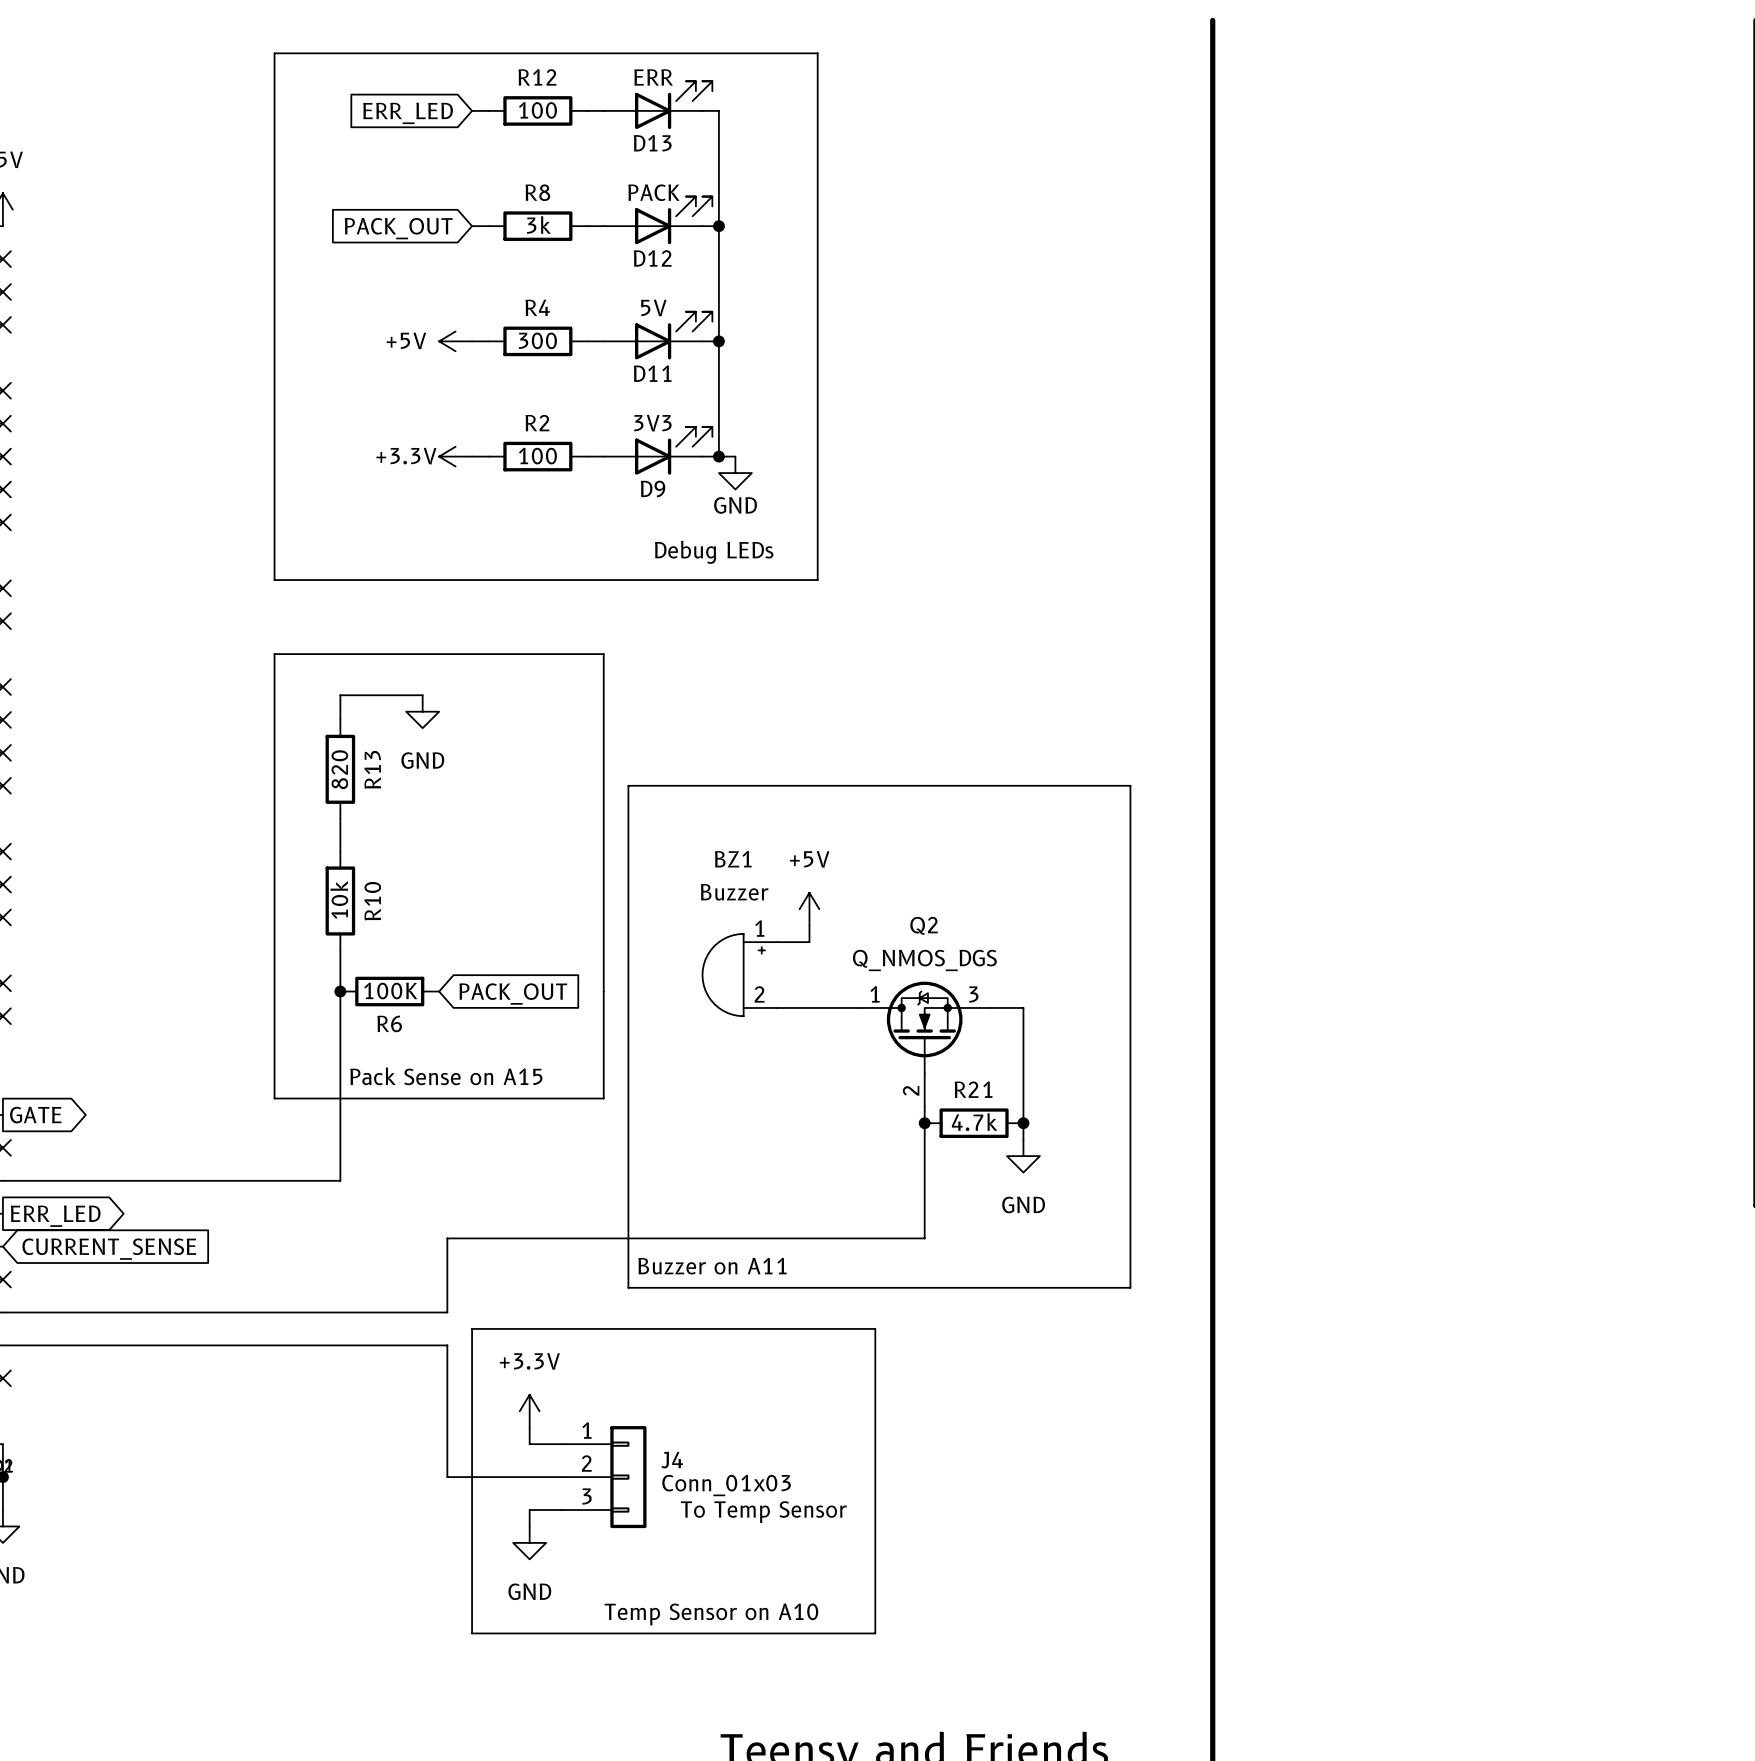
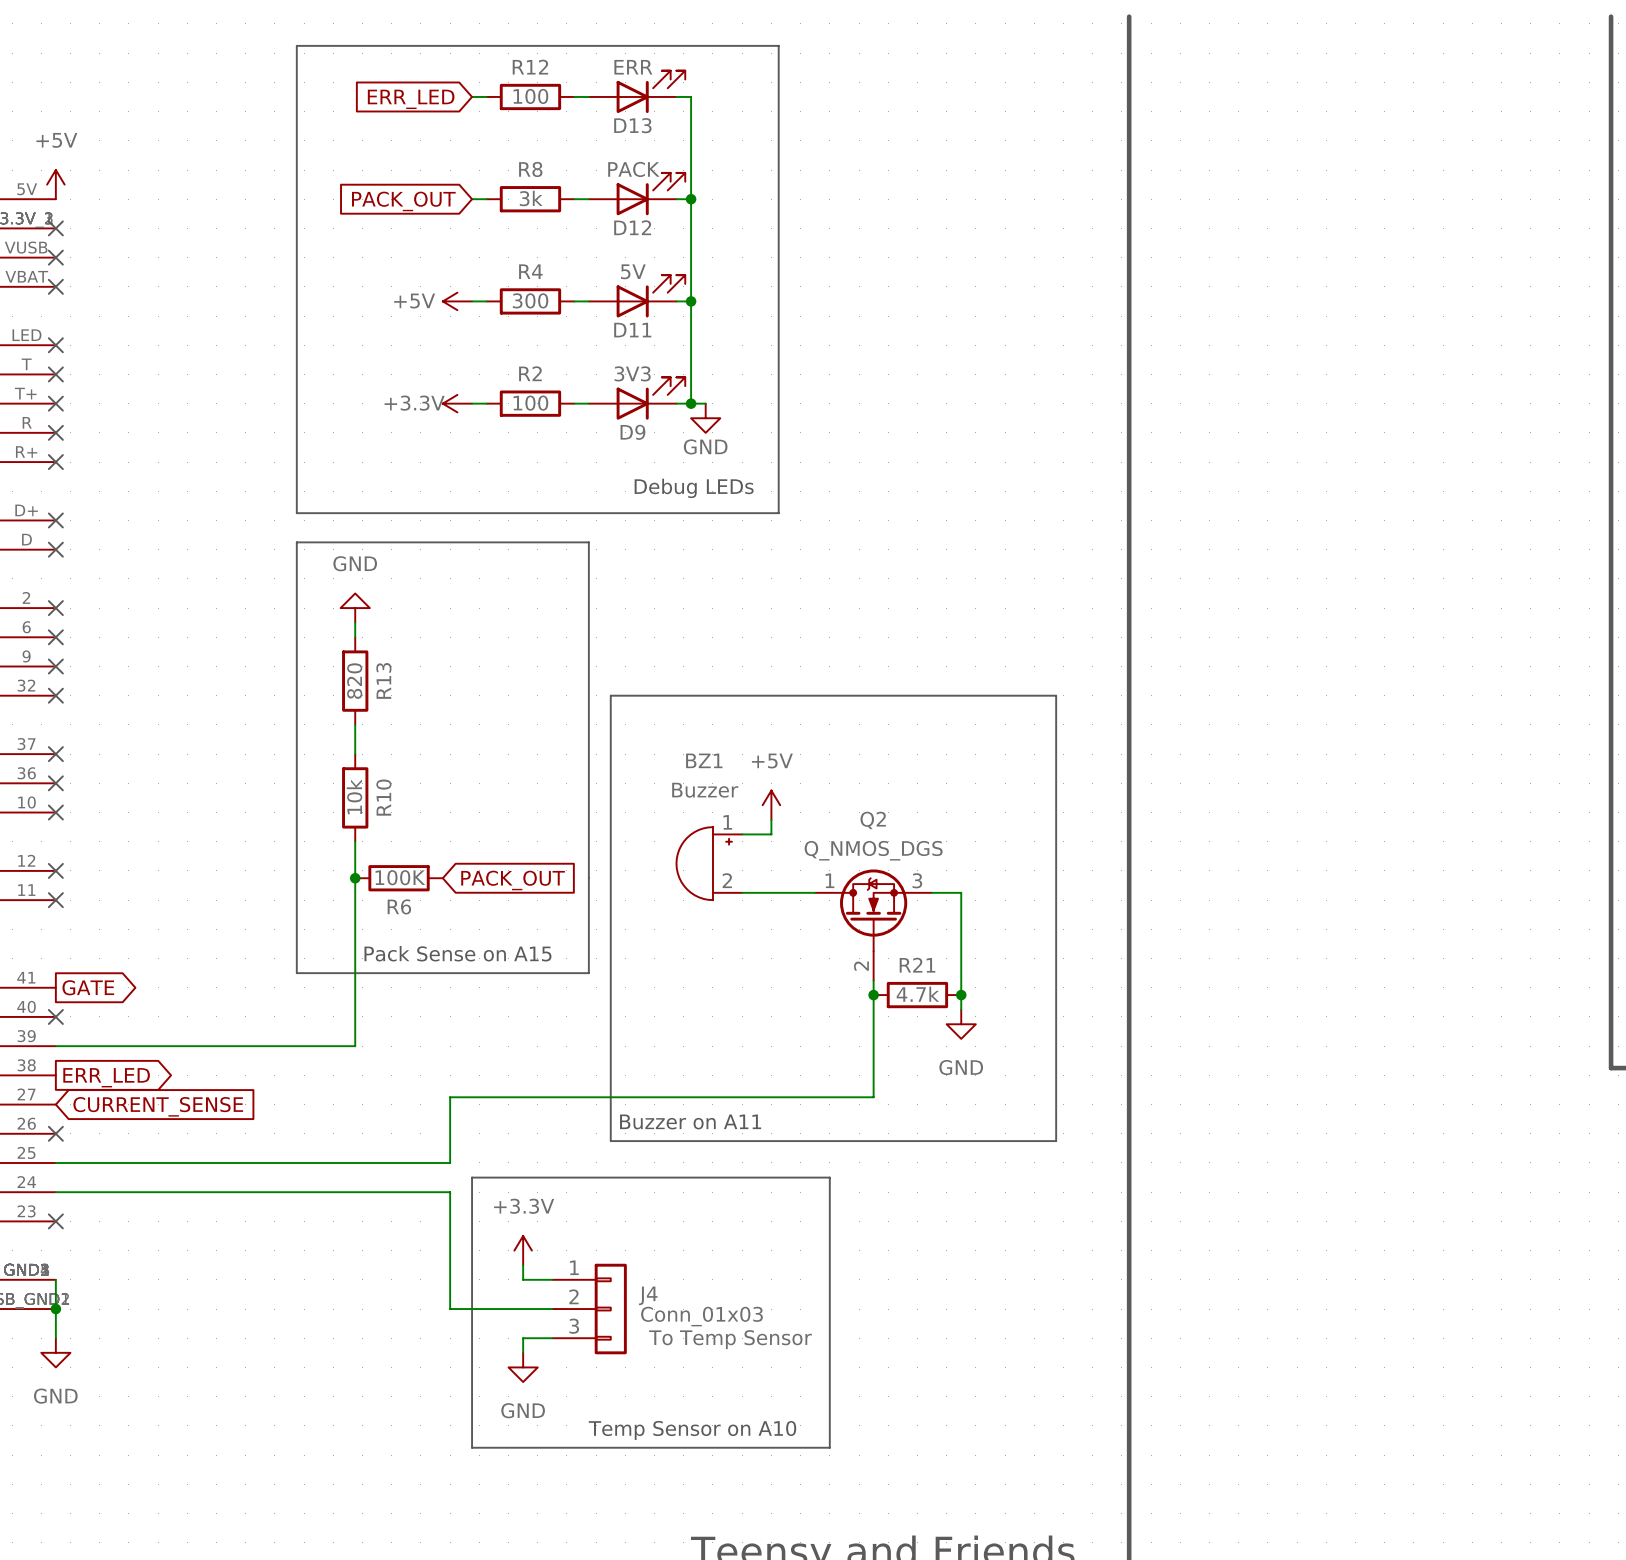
line: (274, 654) (603, 654) -> (296, 578) (296, 542) (588, 542) (588, 578)
wire: (422, 695) (340, 695) (340, 703) -> none
power symbol rotation: 0° (422, 711) -> 180° (355, 608)
power symbol position: GND (422, 711) -> GND (355, 608)

